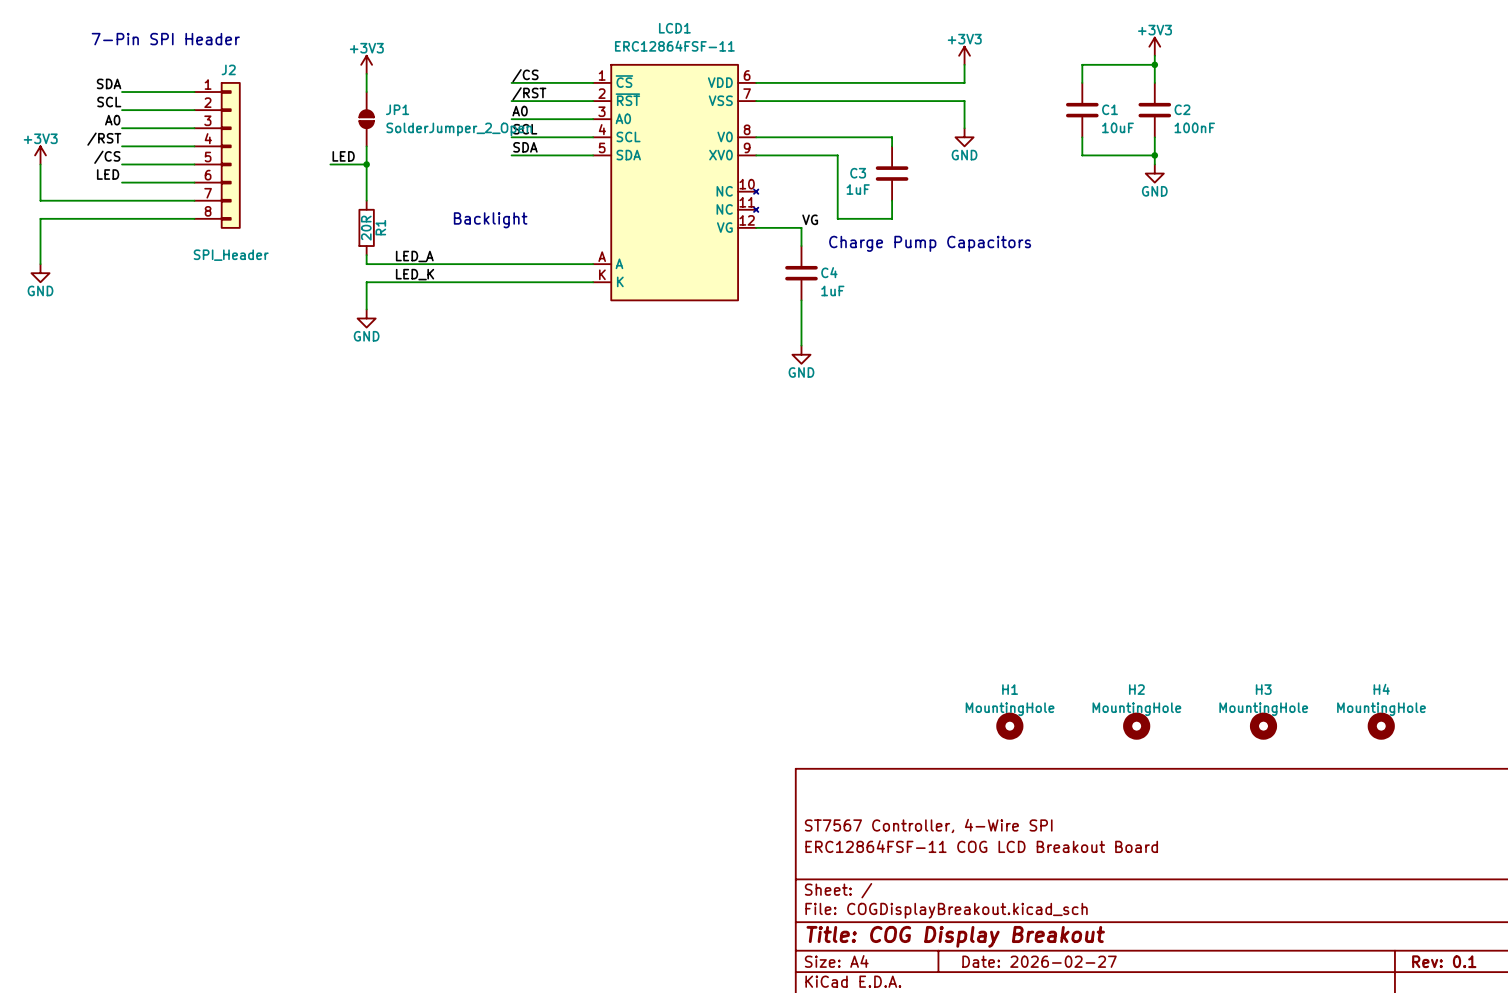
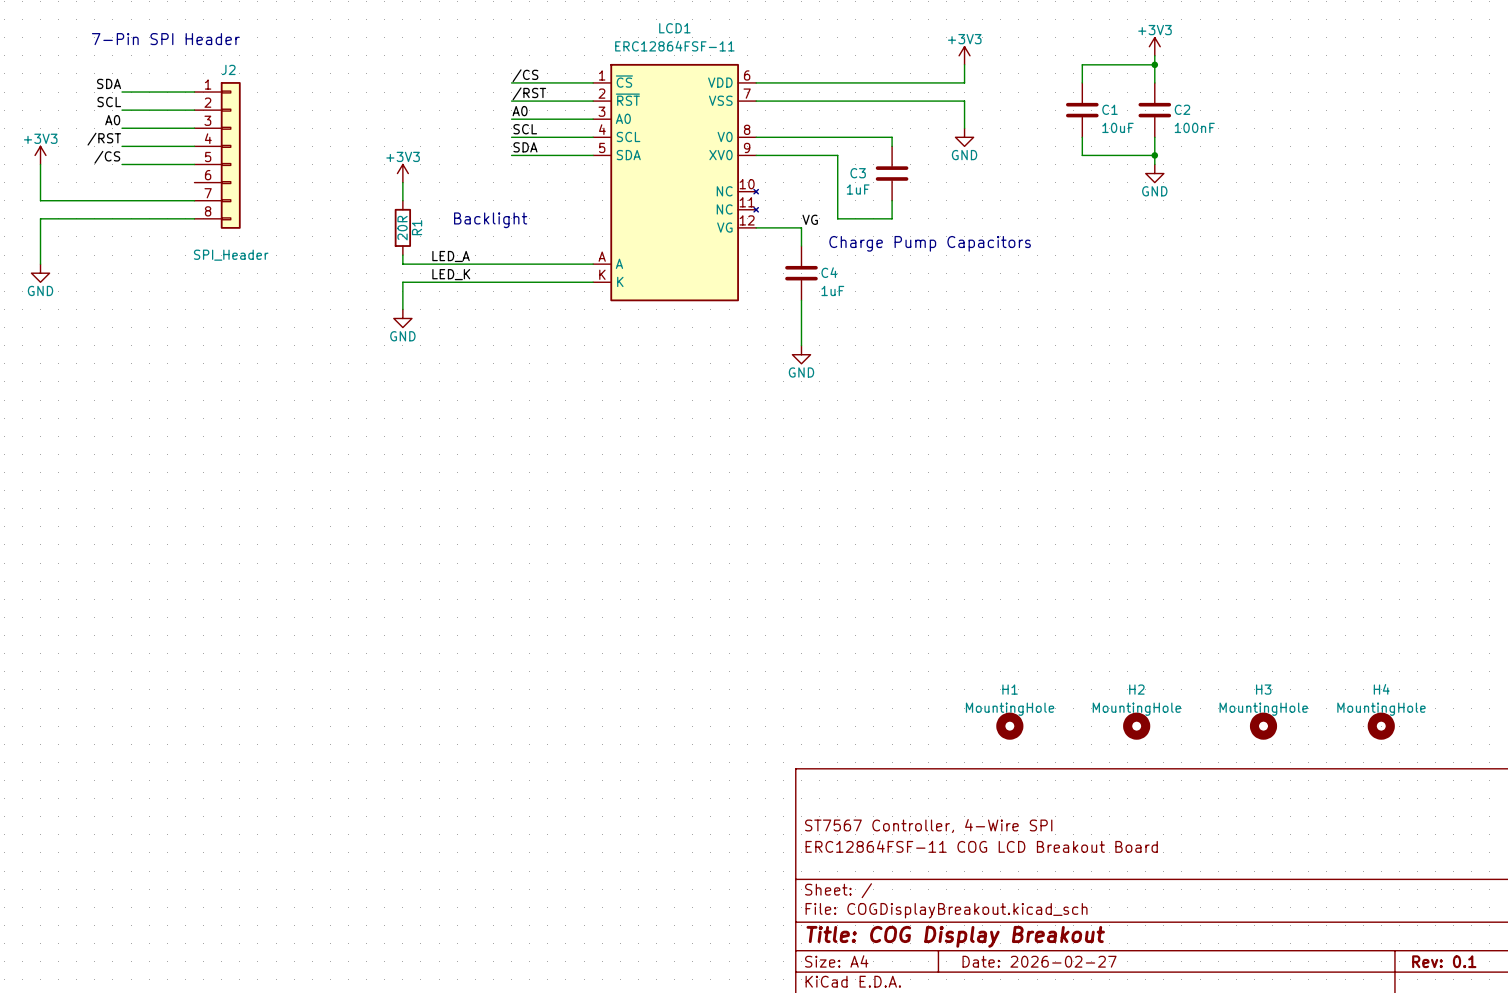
power symbol position: +3V3 (366, 64) -> +3V3 (402, 173)
wire: (366, 73) (366, 92) -> (402, 182) (402, 200)
JP1: SolderJumper_2_Open (366, 119) -> none
wire: (366, 146) (366, 200) -> none
label: LED (343, 156) -> none
wire: (330, 164) (366, 164) -> none
junction: (366, 164) -> none
label: LED (108, 174) -> none
wire: (122, 182) (194, 182) -> none
R1 position: (366, 227) -> (402, 227)
wire: (366, 255) (366, 264) (402, 264) -> (402, 255) (402, 264)
label position: LED_A (414, 256) -> LED_A (451, 256)
label position: LED_K (415, 274) -> LED_K (451, 274)
wire: (402, 282) (366, 282) (366, 309) -> (402, 282) (402, 309)
power symbol position: GND (366, 318) -> GND (402, 318)

